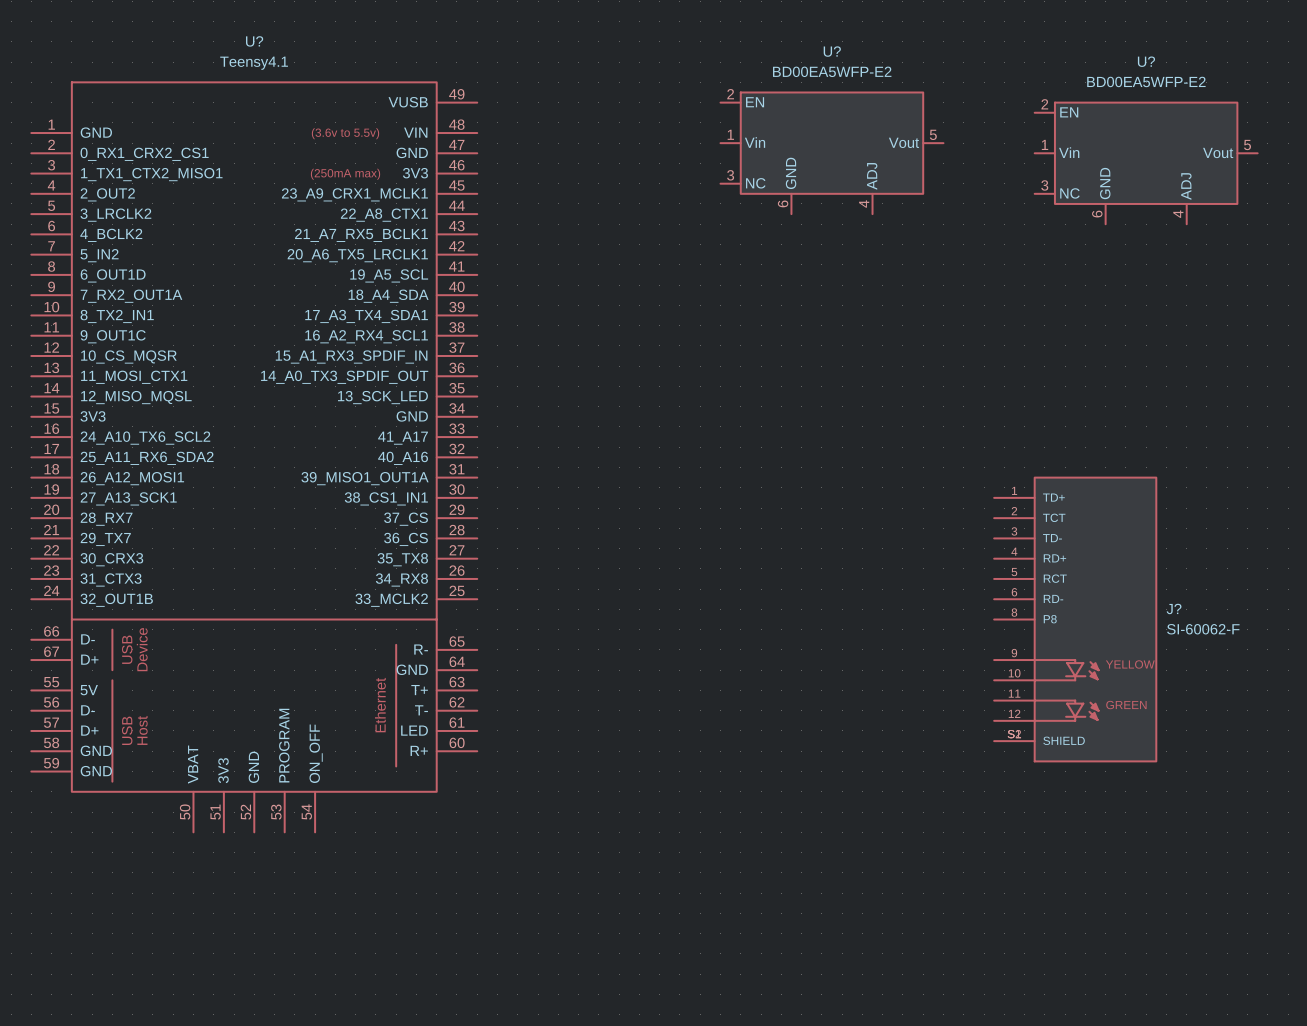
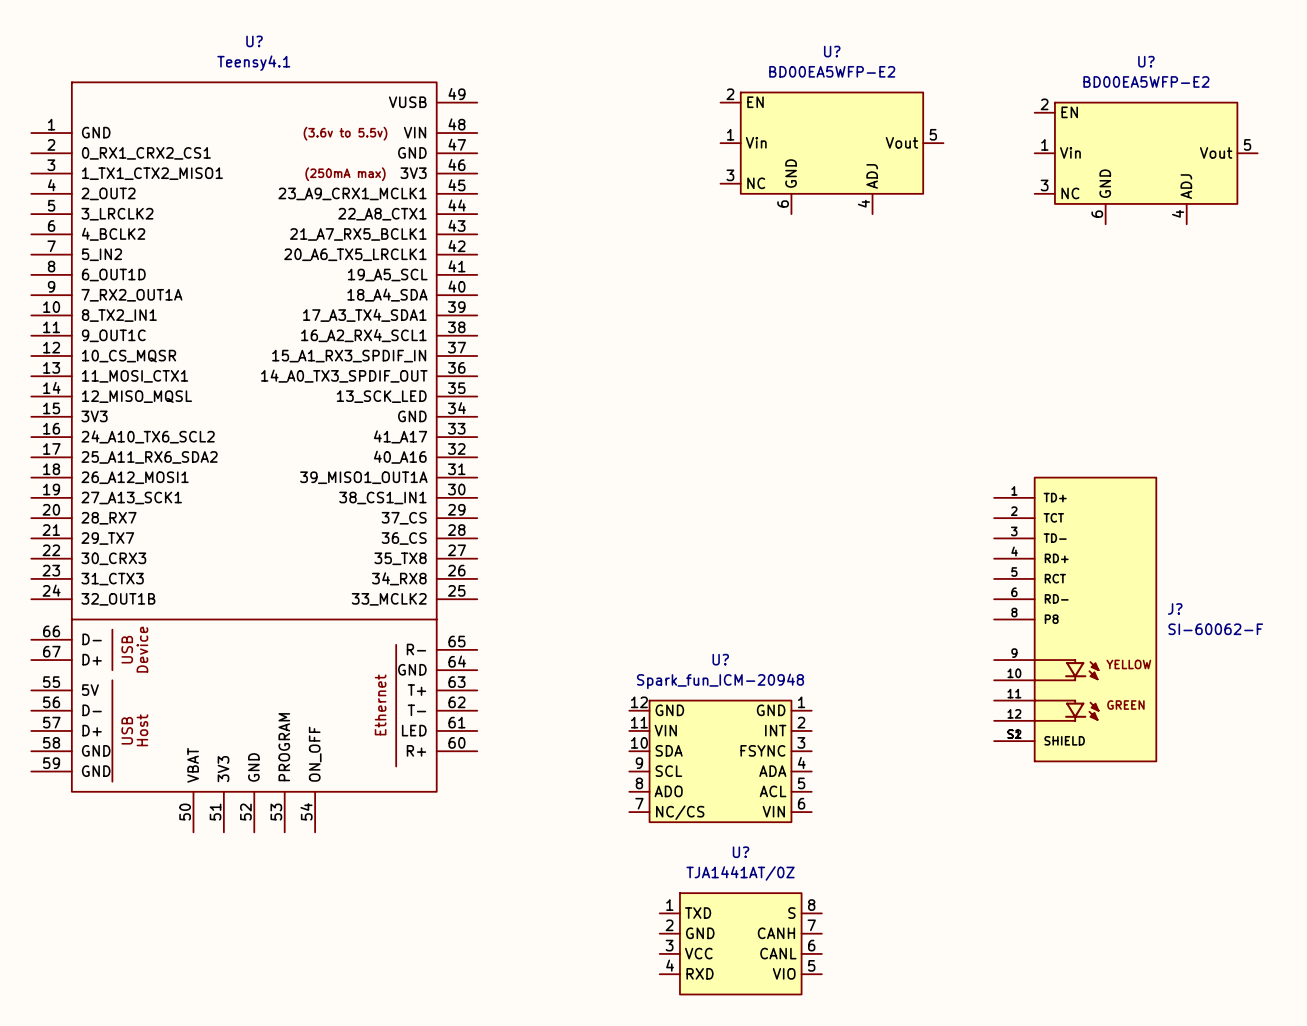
U?: none -> Spark_fun_ICM-20948 (720, 761)
U?: none -> TJA1441AT/0Z (740, 943)

